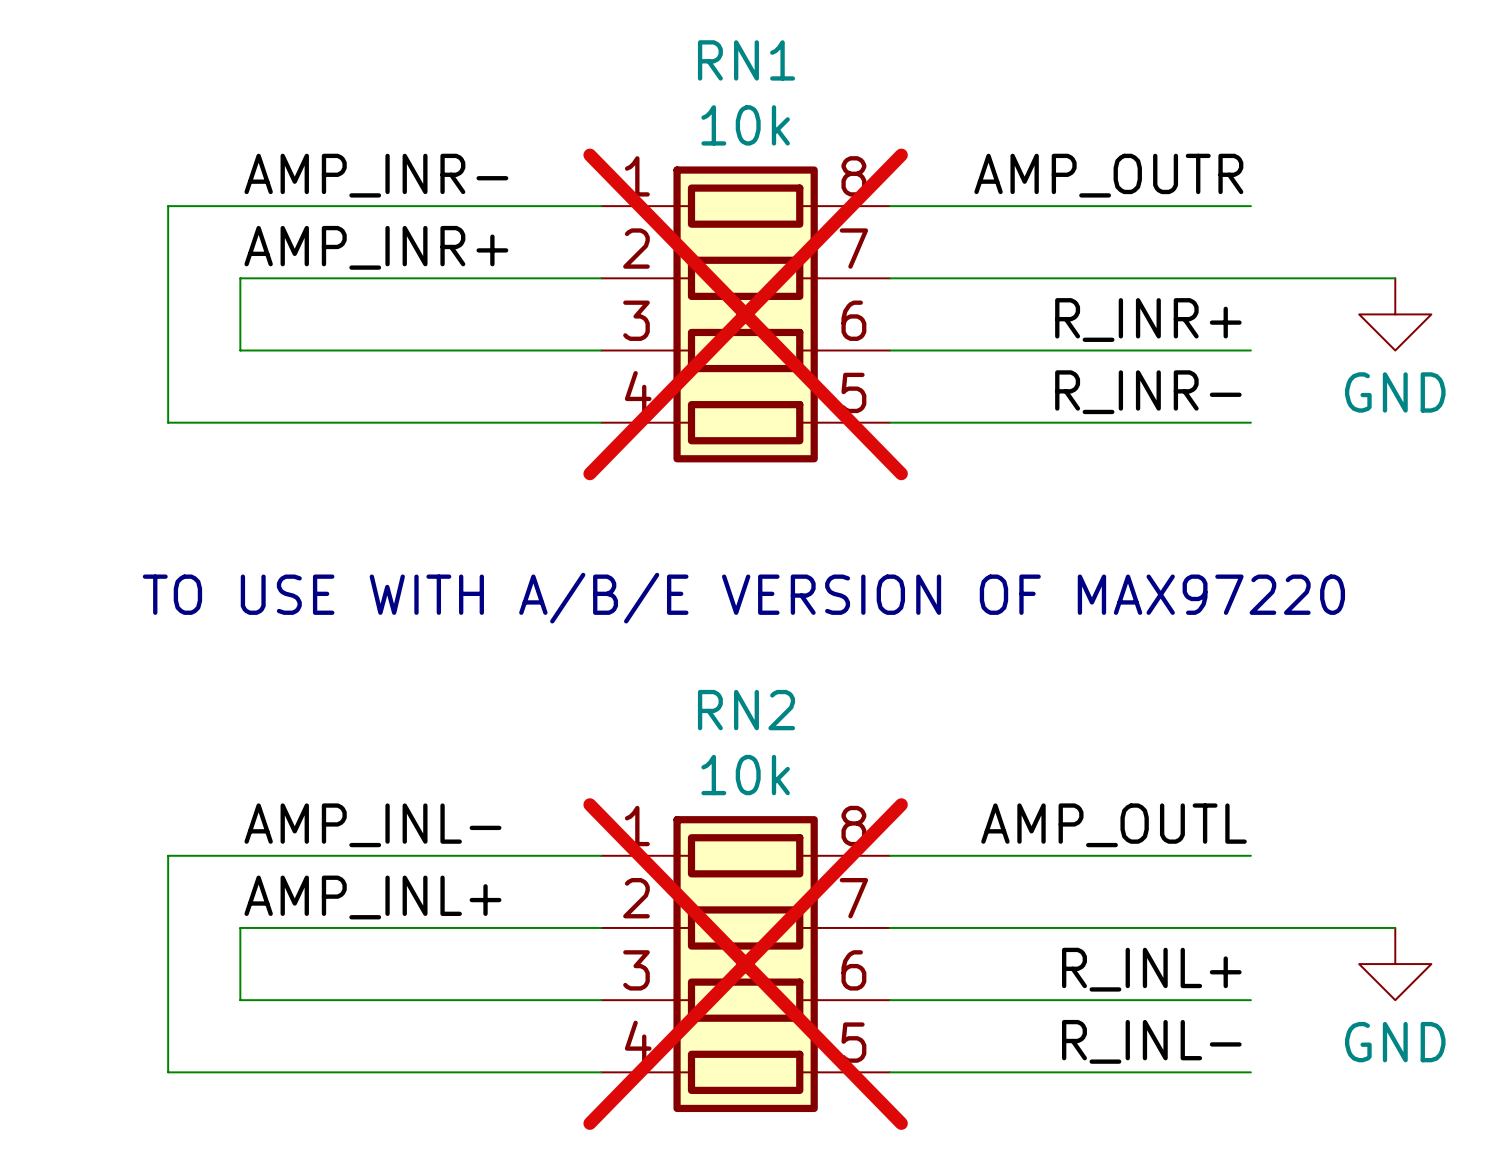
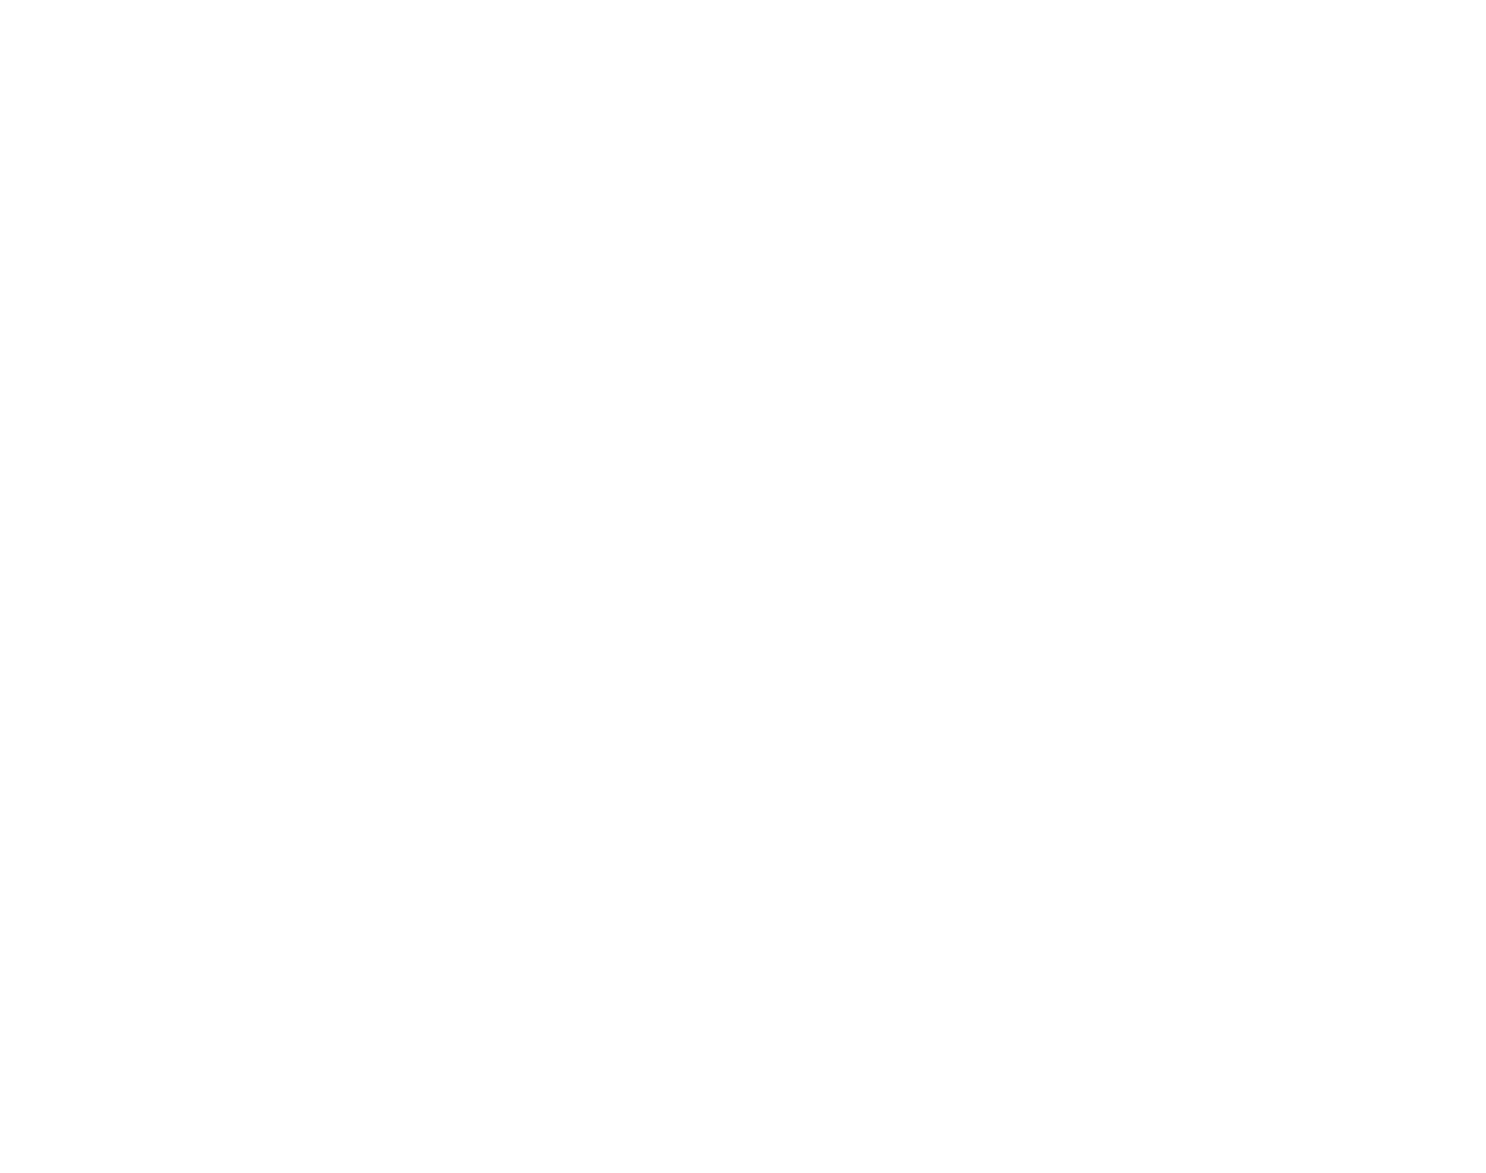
label: AMP_INR- (376, 175) -> none
label: AMP_OUTR (1108, 175) -> none
wire: (601, 206) (168, 206) (168, 422) (601, 422) -> none
wire: (889, 206) (1250, 206) -> none
label: AMP_INR+ (376, 247) -> none
wire: (601, 278) (240, 278) (240, 350) (601, 350) -> none
wire: (889, 278) (1395, 278) -> none
RN1: 10k (745, 314) -> none
power symbol: GND (1395, 314) -> none
label: R_INR+ (1148, 320) -> none
wire: (889, 350) (1250, 350) -> none
label: R_INR- (1148, 392) -> none
wire: (889, 422) (1250, 422) -> none
text: TO USE WITH A/B/E VERSION OF MAX97220 (743, 598) -> none
label: AMP_INL- (372, 825) -> none
label: AMP_OUTL (1114, 825) -> none
wire: (601, 855) (168, 855) (168, 1072) (601, 1072) -> none
wire: (889, 855) (1250, 855) -> none
label: AMP_INL+ (372, 897) -> none
wire: (601, 927) (240, 927) (240, 1000) (601, 1000) -> none
wire: (889, 927) (1395, 927) -> none
RN2: 10k (745, 964) -> none
power symbol: GND (1395, 964) -> none
label: R_INL+ (1151, 969) -> none
wire: (889, 1000) (1250, 1000) -> none
label: R_INL- (1151, 1041) -> none
wire: (889, 1072) (1250, 1072) -> none

